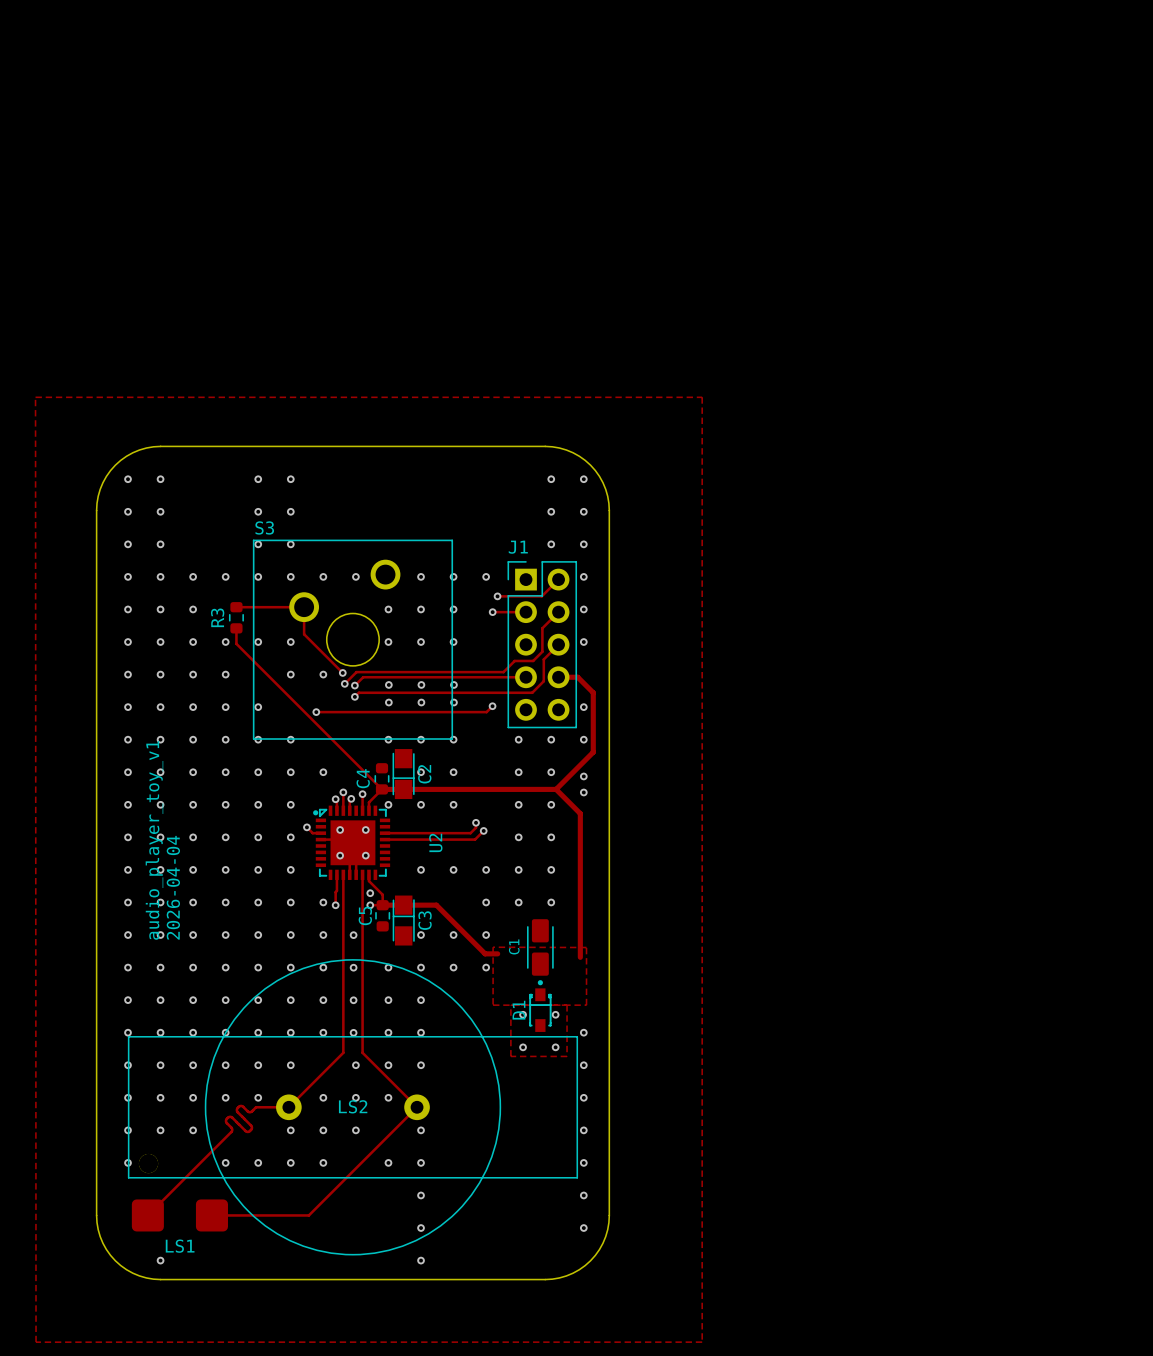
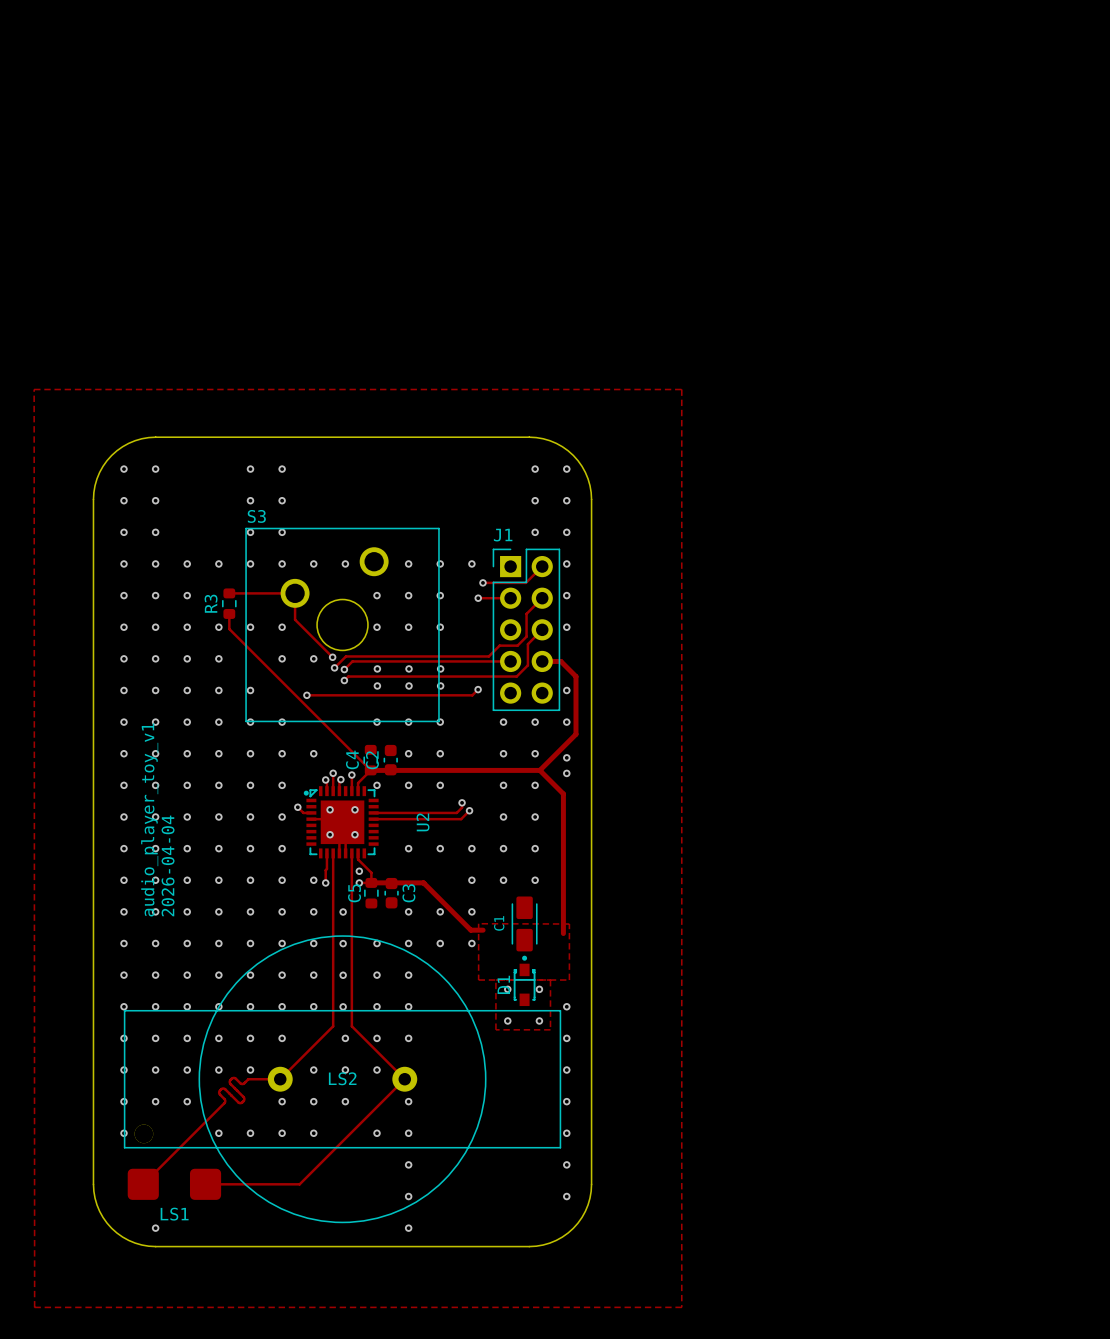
C2 footprint: [392, 749, 415, 800] -> [383, 744, 398, 776]
C2 name position: C2 (424, 774) -> C2 (372, 760)
C3 footprint: [392, 895, 415, 946] -> [384, 877, 399, 909]

